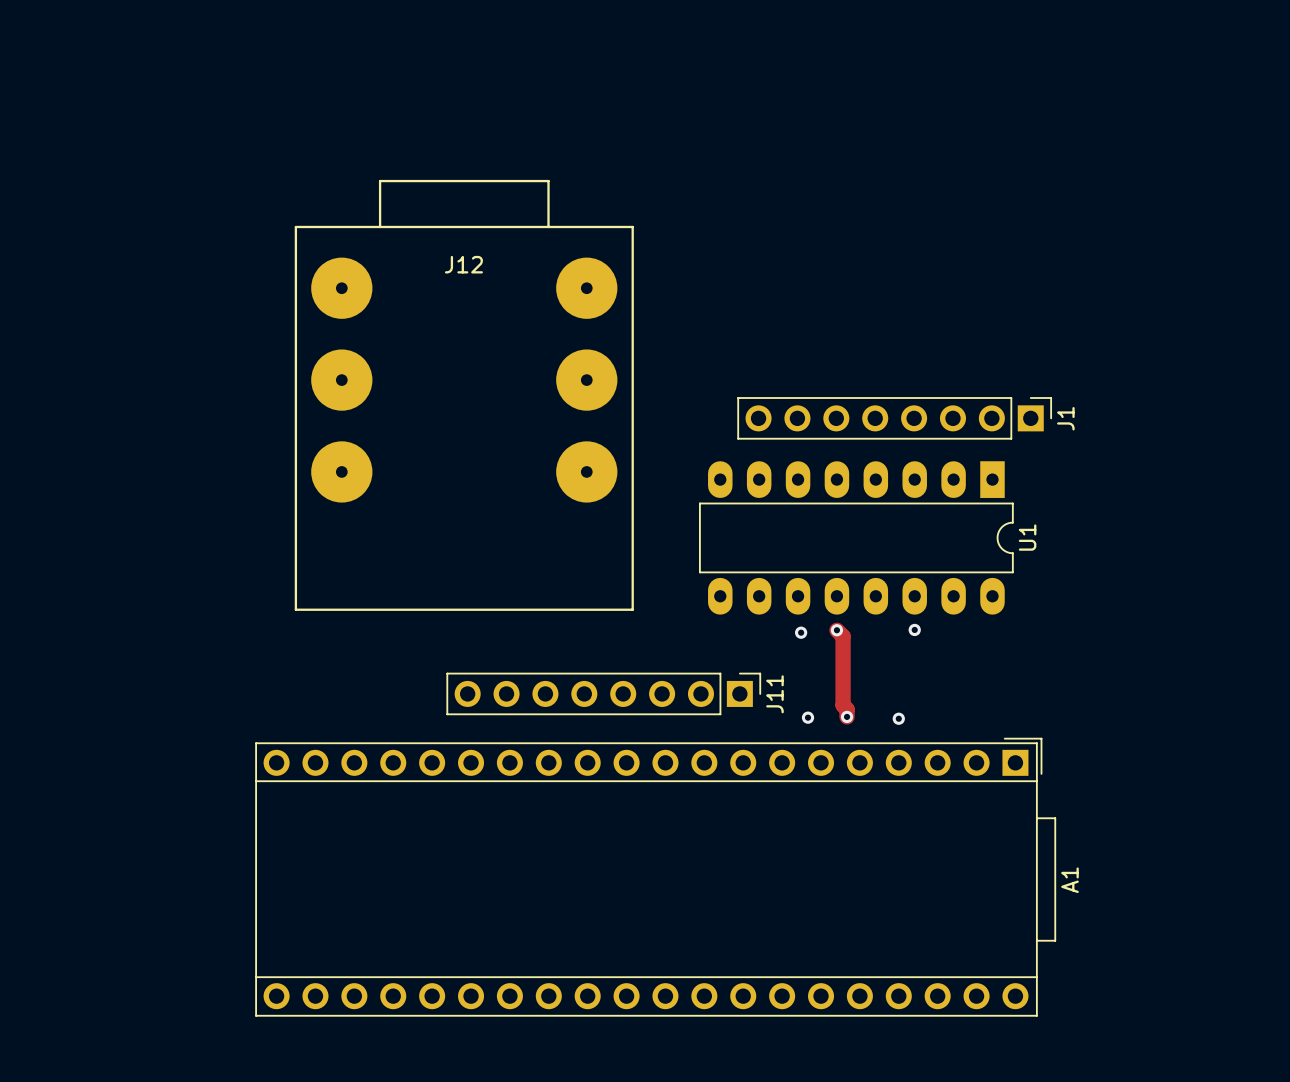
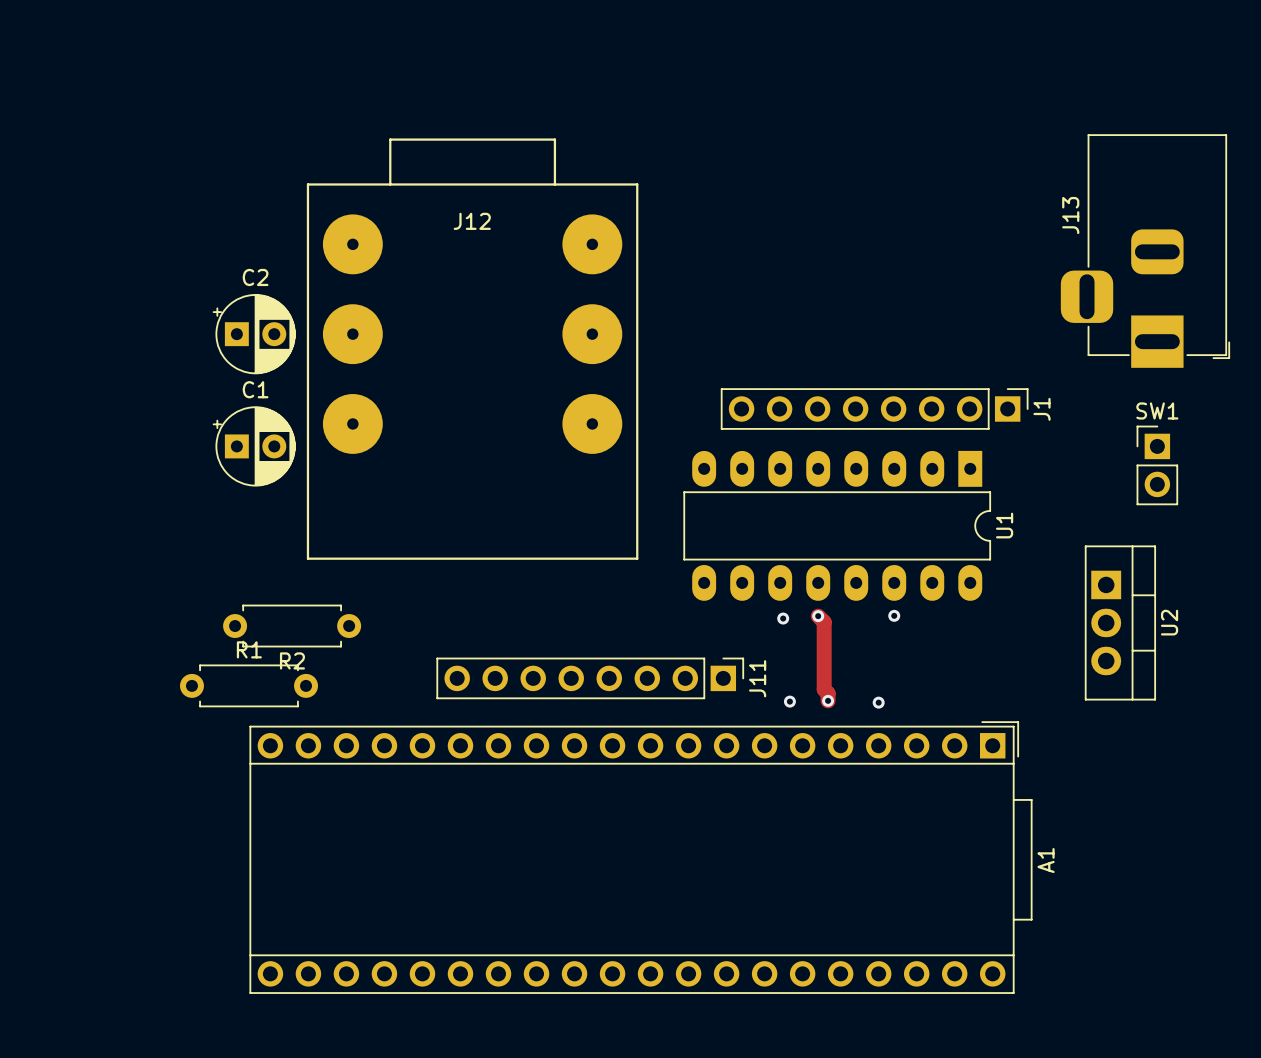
J13: none -> (1145, 251)
C2: none -> (254, 334)
J12 position: (464, 395) -> (472, 349)
C1: none -> (254, 446)
SW1: none -> (1157, 465)
U2: none -> (1120, 622)
R2: none -> (292, 626)
R1: none -> (249, 685)

